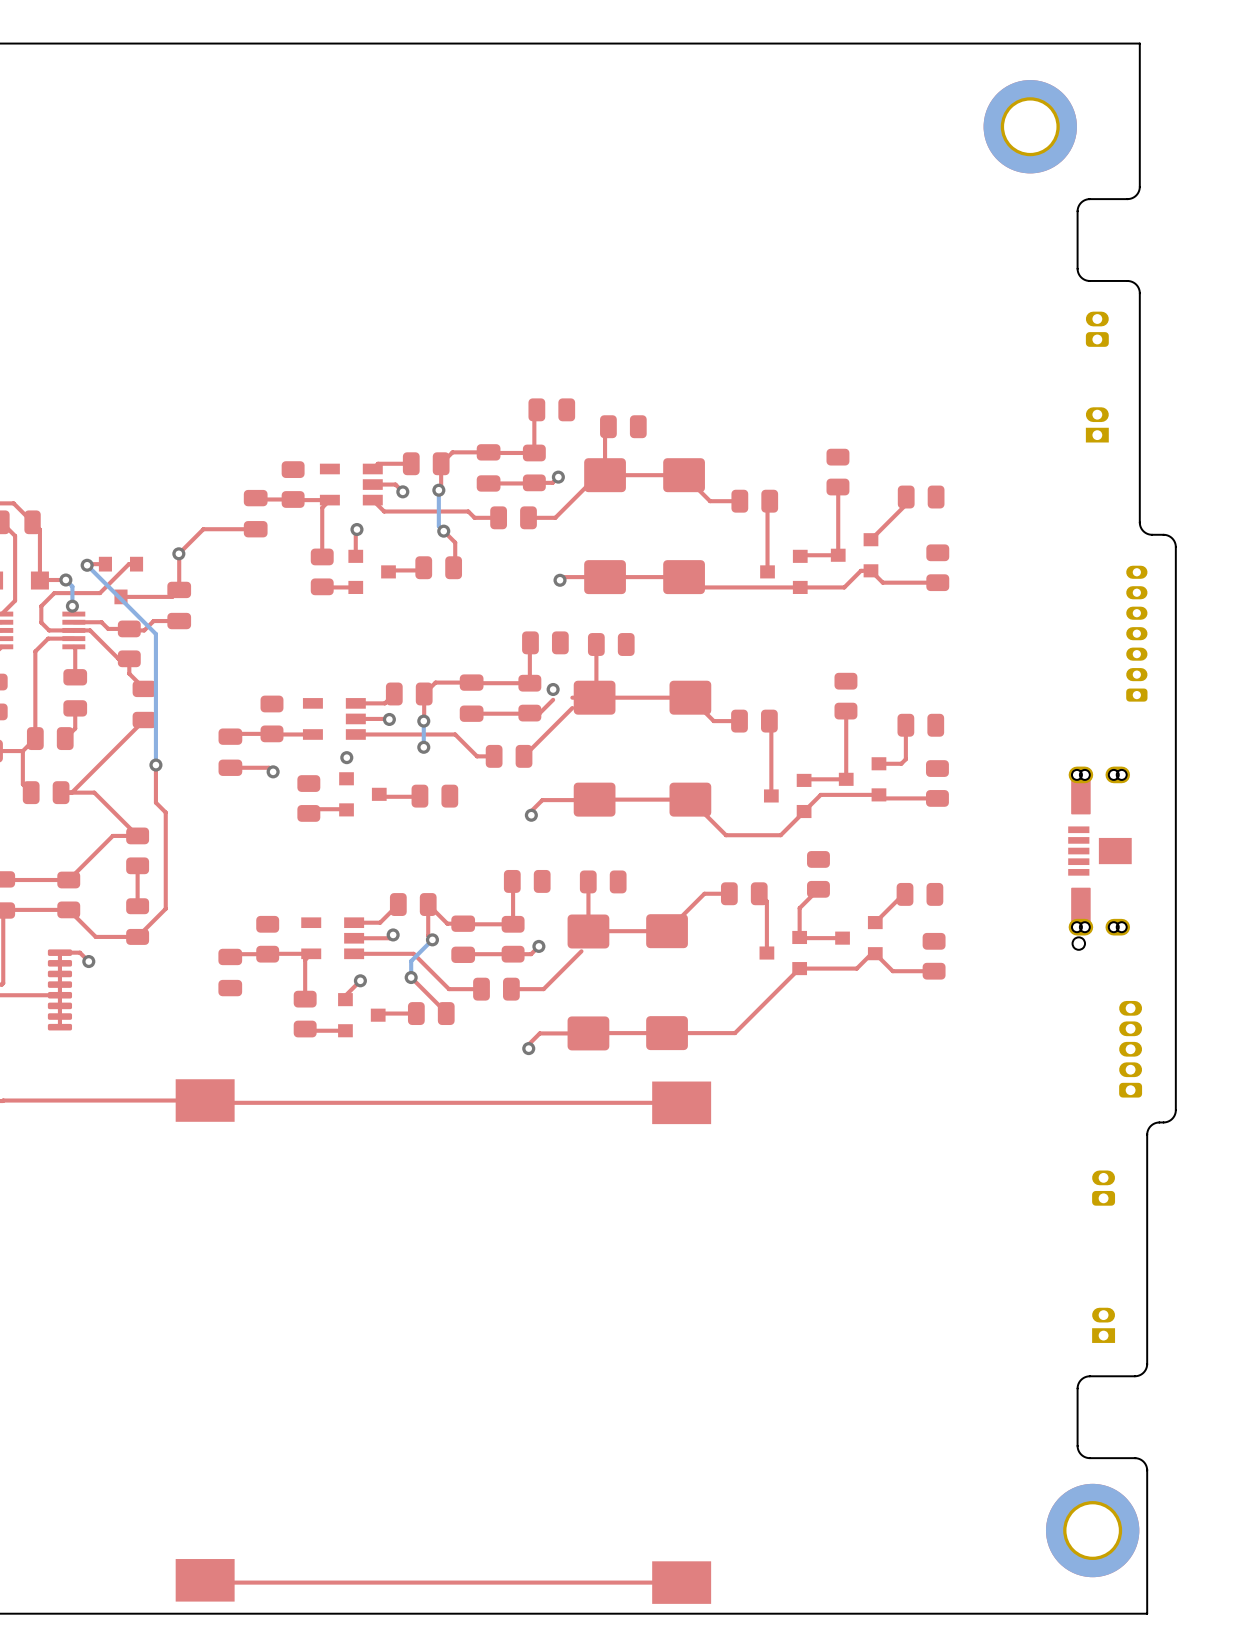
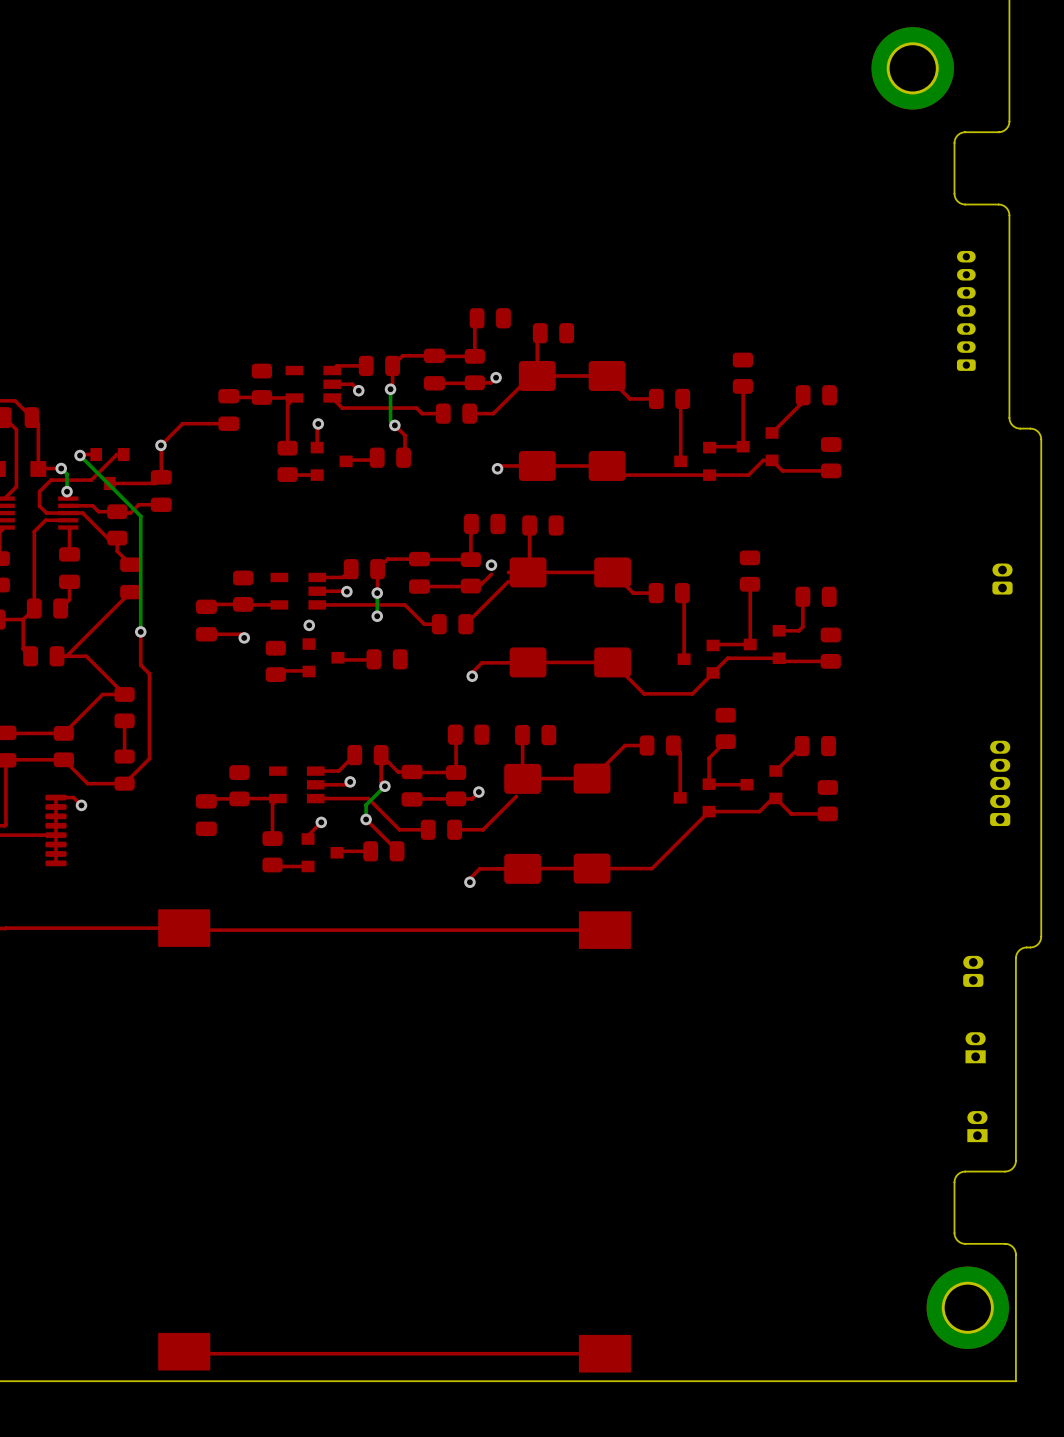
part: (1097, 329) -> none
part: (1097, 424) -> none
part position: (1136, 633) -> (966, 310)
part: none -> (1002, 579)
part: (1099, 858) -> none
part position: (1130, 1049) -> (1000, 783)
part position: (1103, 1188) -> (973, 971)
part: none -> (975, 1047)

